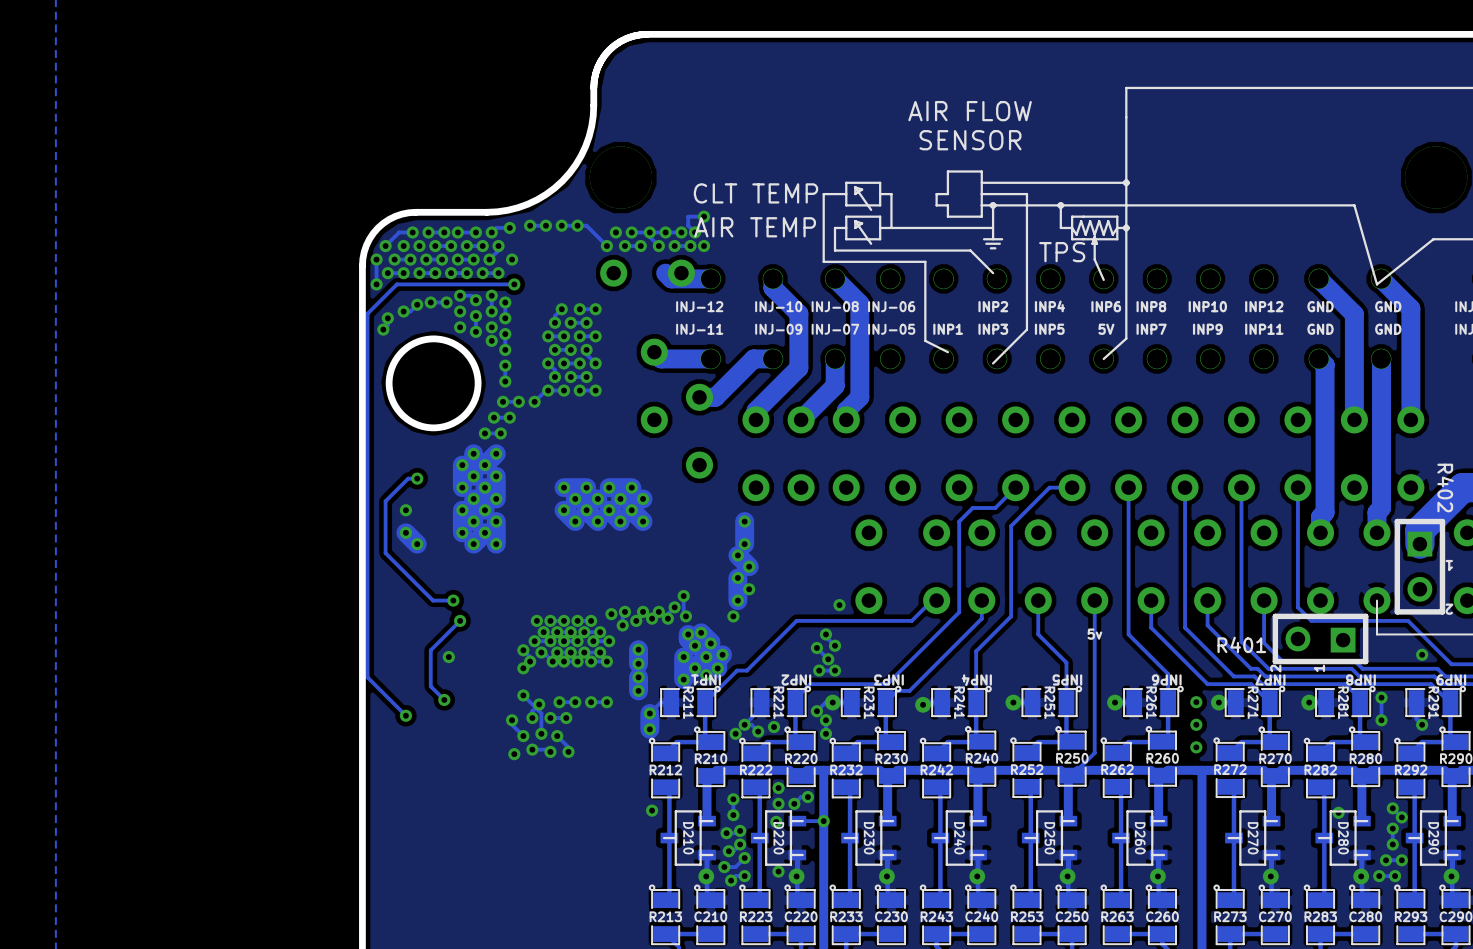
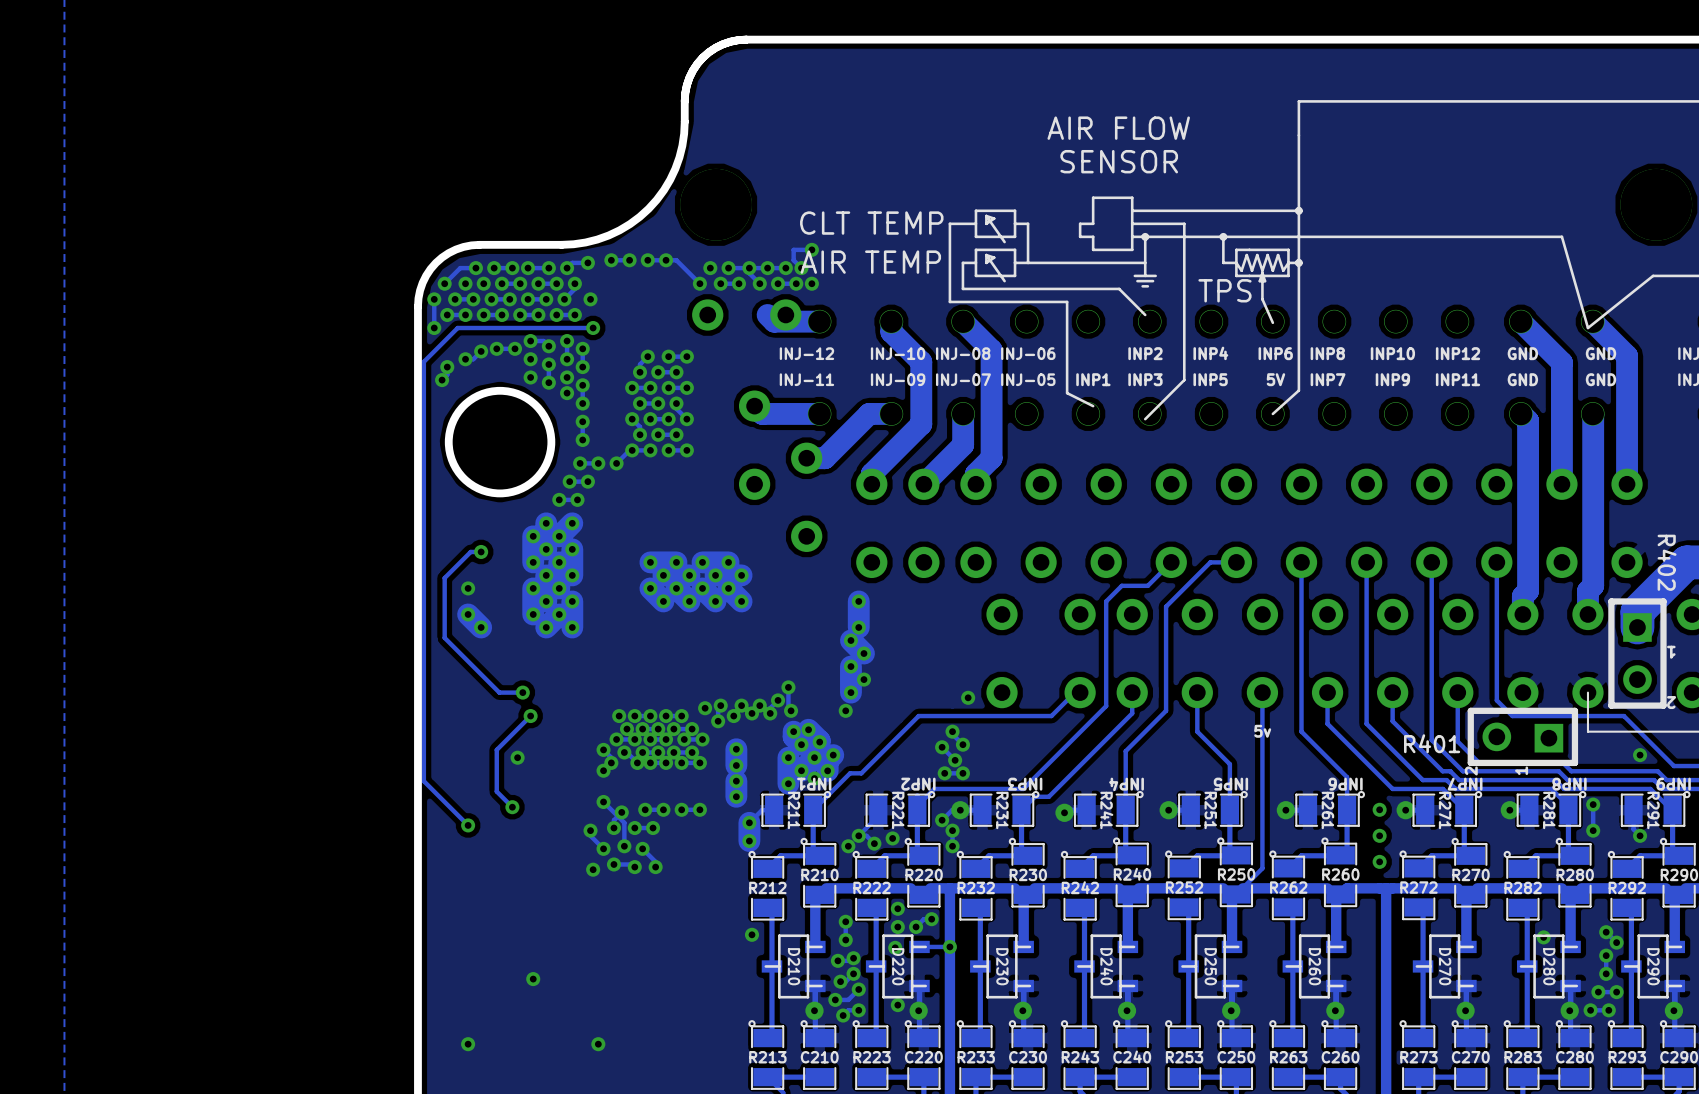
via: none -> (533, 979)
via: none -> (468, 1044)
via: none -> (598, 1044)

